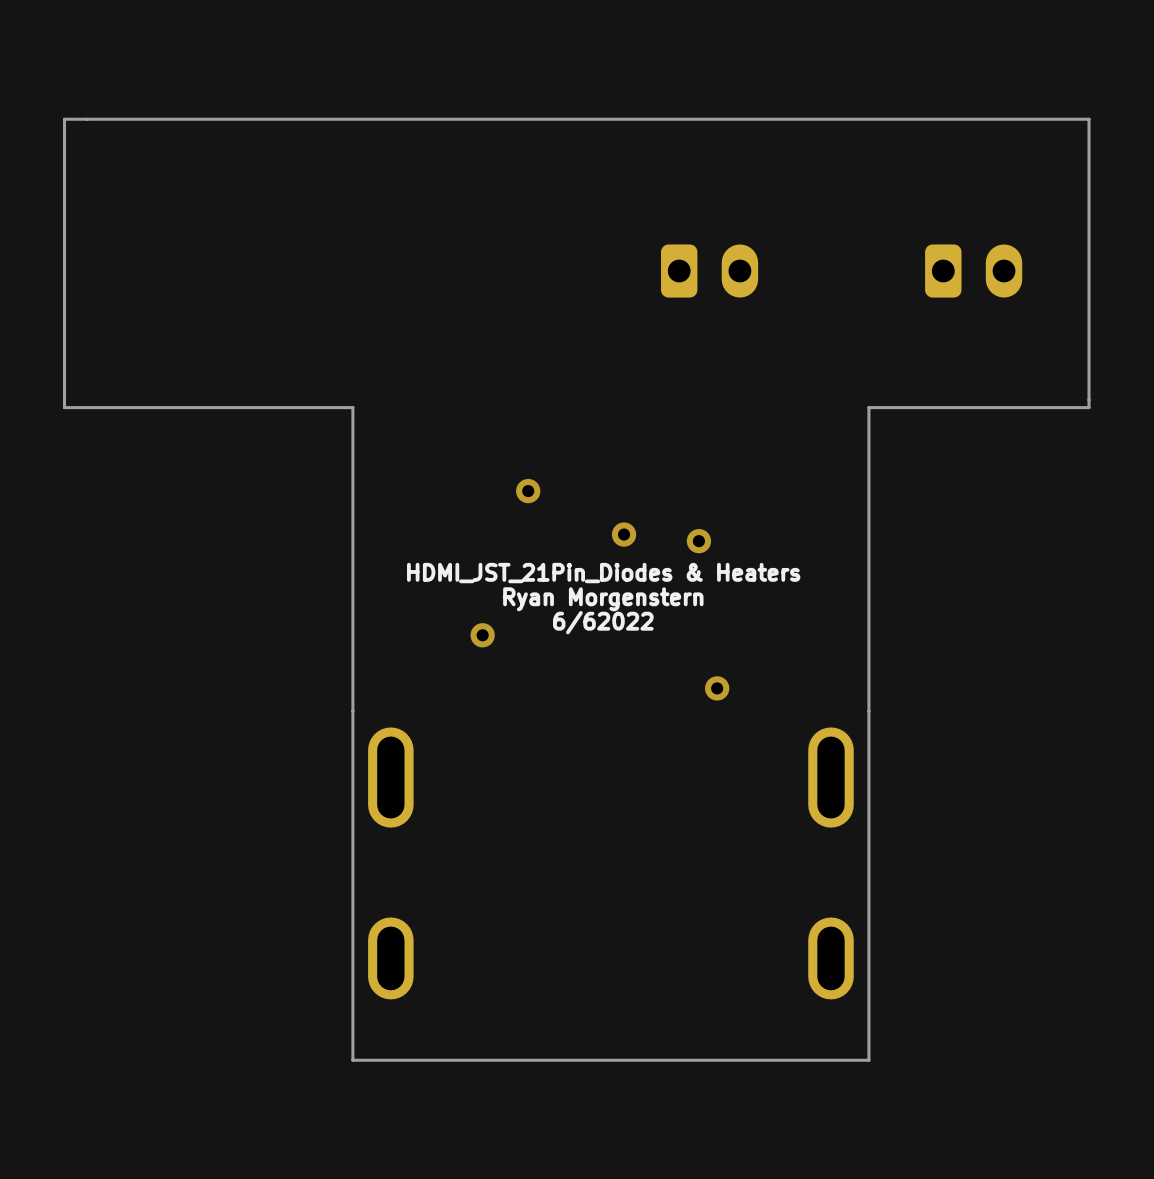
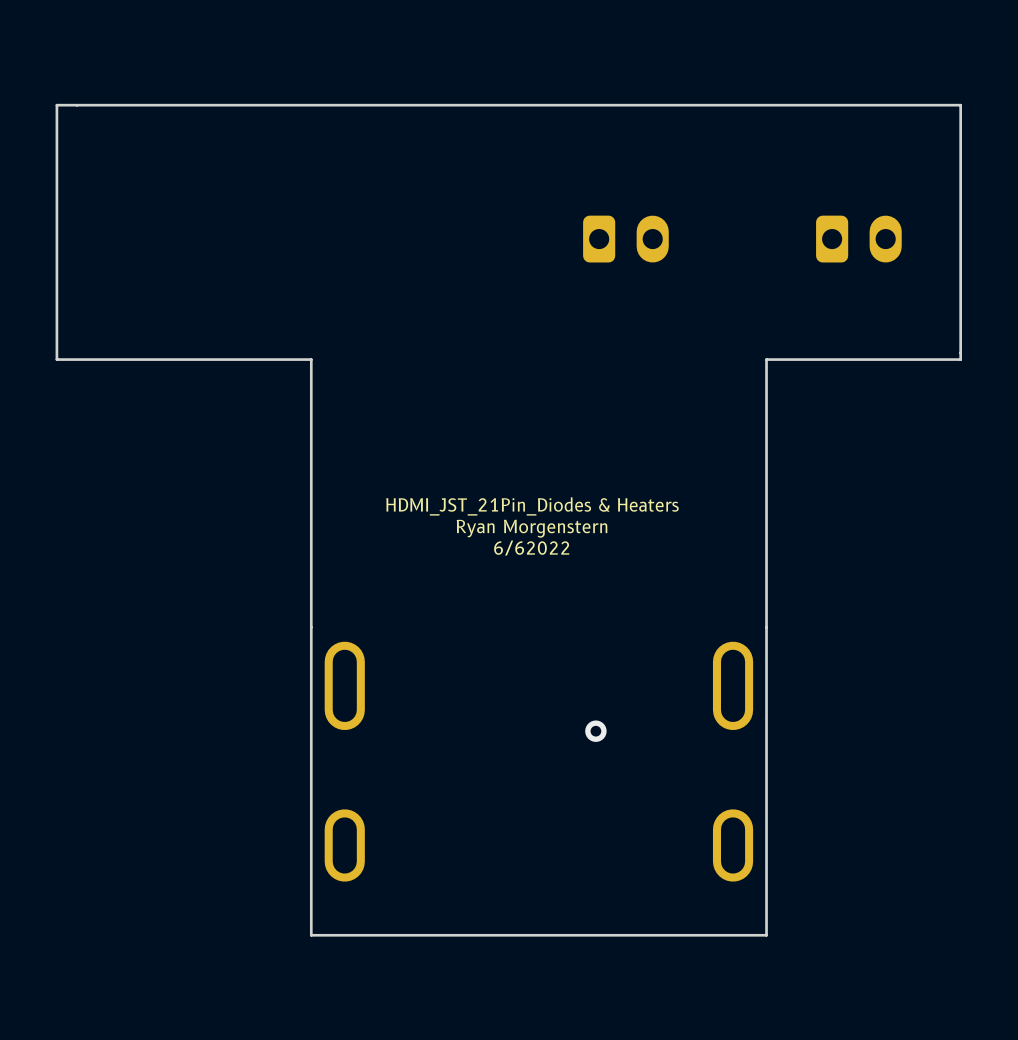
via: (528, 491) -> none
via: (624, 534) -> none
via: (698, 541) -> none
via: (482, 635) -> none
via: (717, 688) -> none
via: none -> (595, 731)

